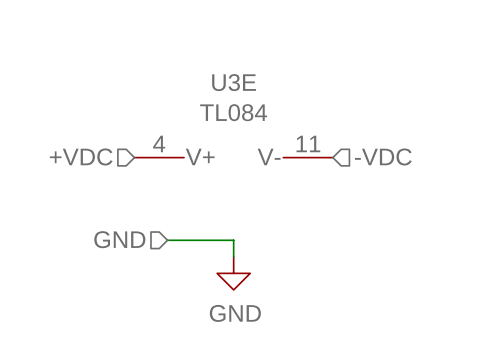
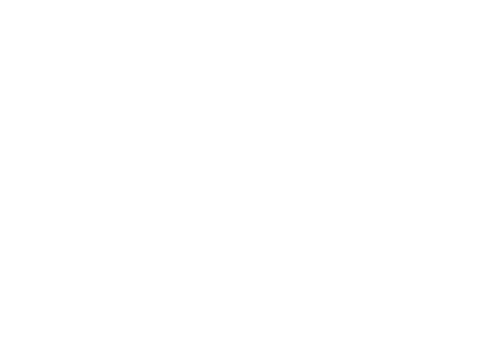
hierarchical label: +VDC (81, 156) -> none
hierarchical label: -VDC (383, 156) -> none
U3E: TL084 (233, 157) -> none
hierarchical label: GND (119, 239) -> none
wire: (167, 240) (233, 240) (233, 256) -> none
power symbol: GND (233, 273) -> none

